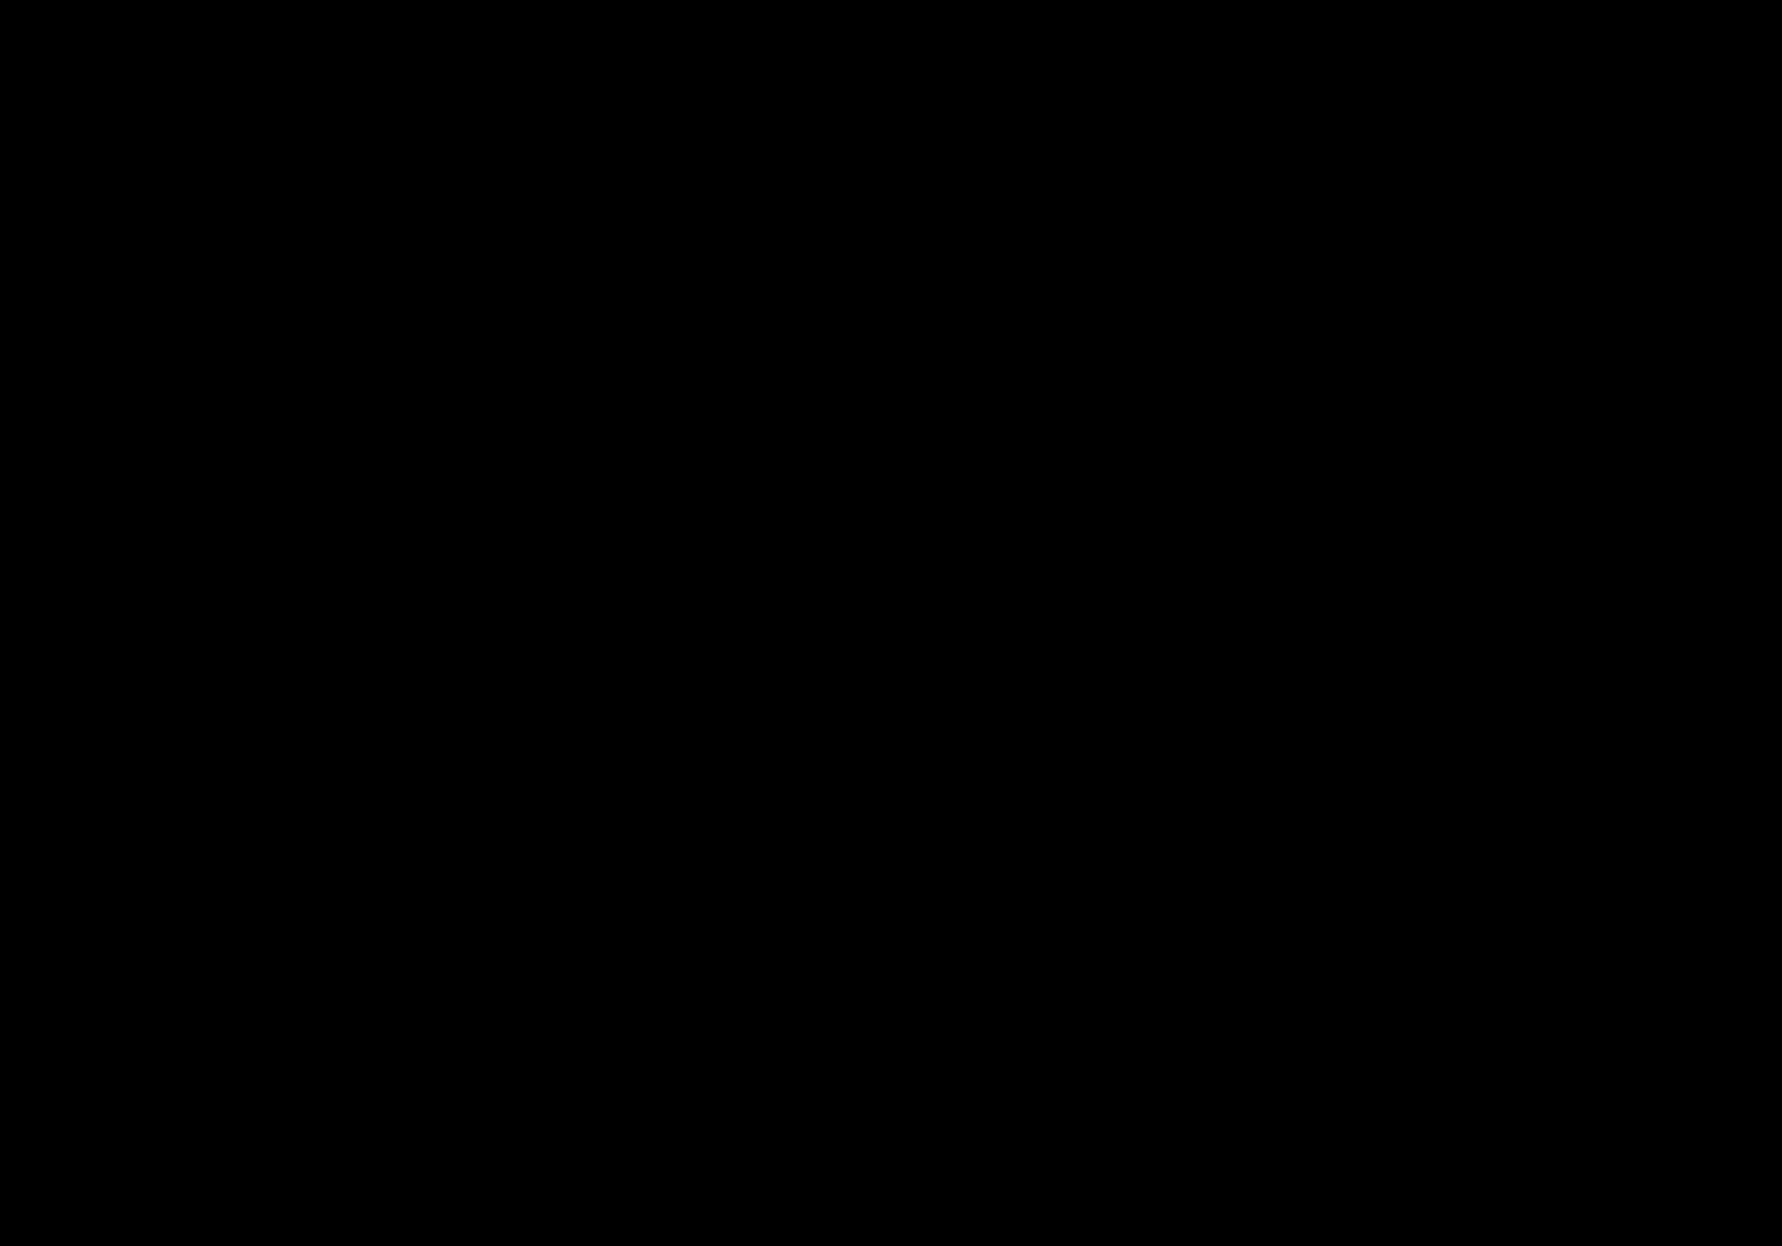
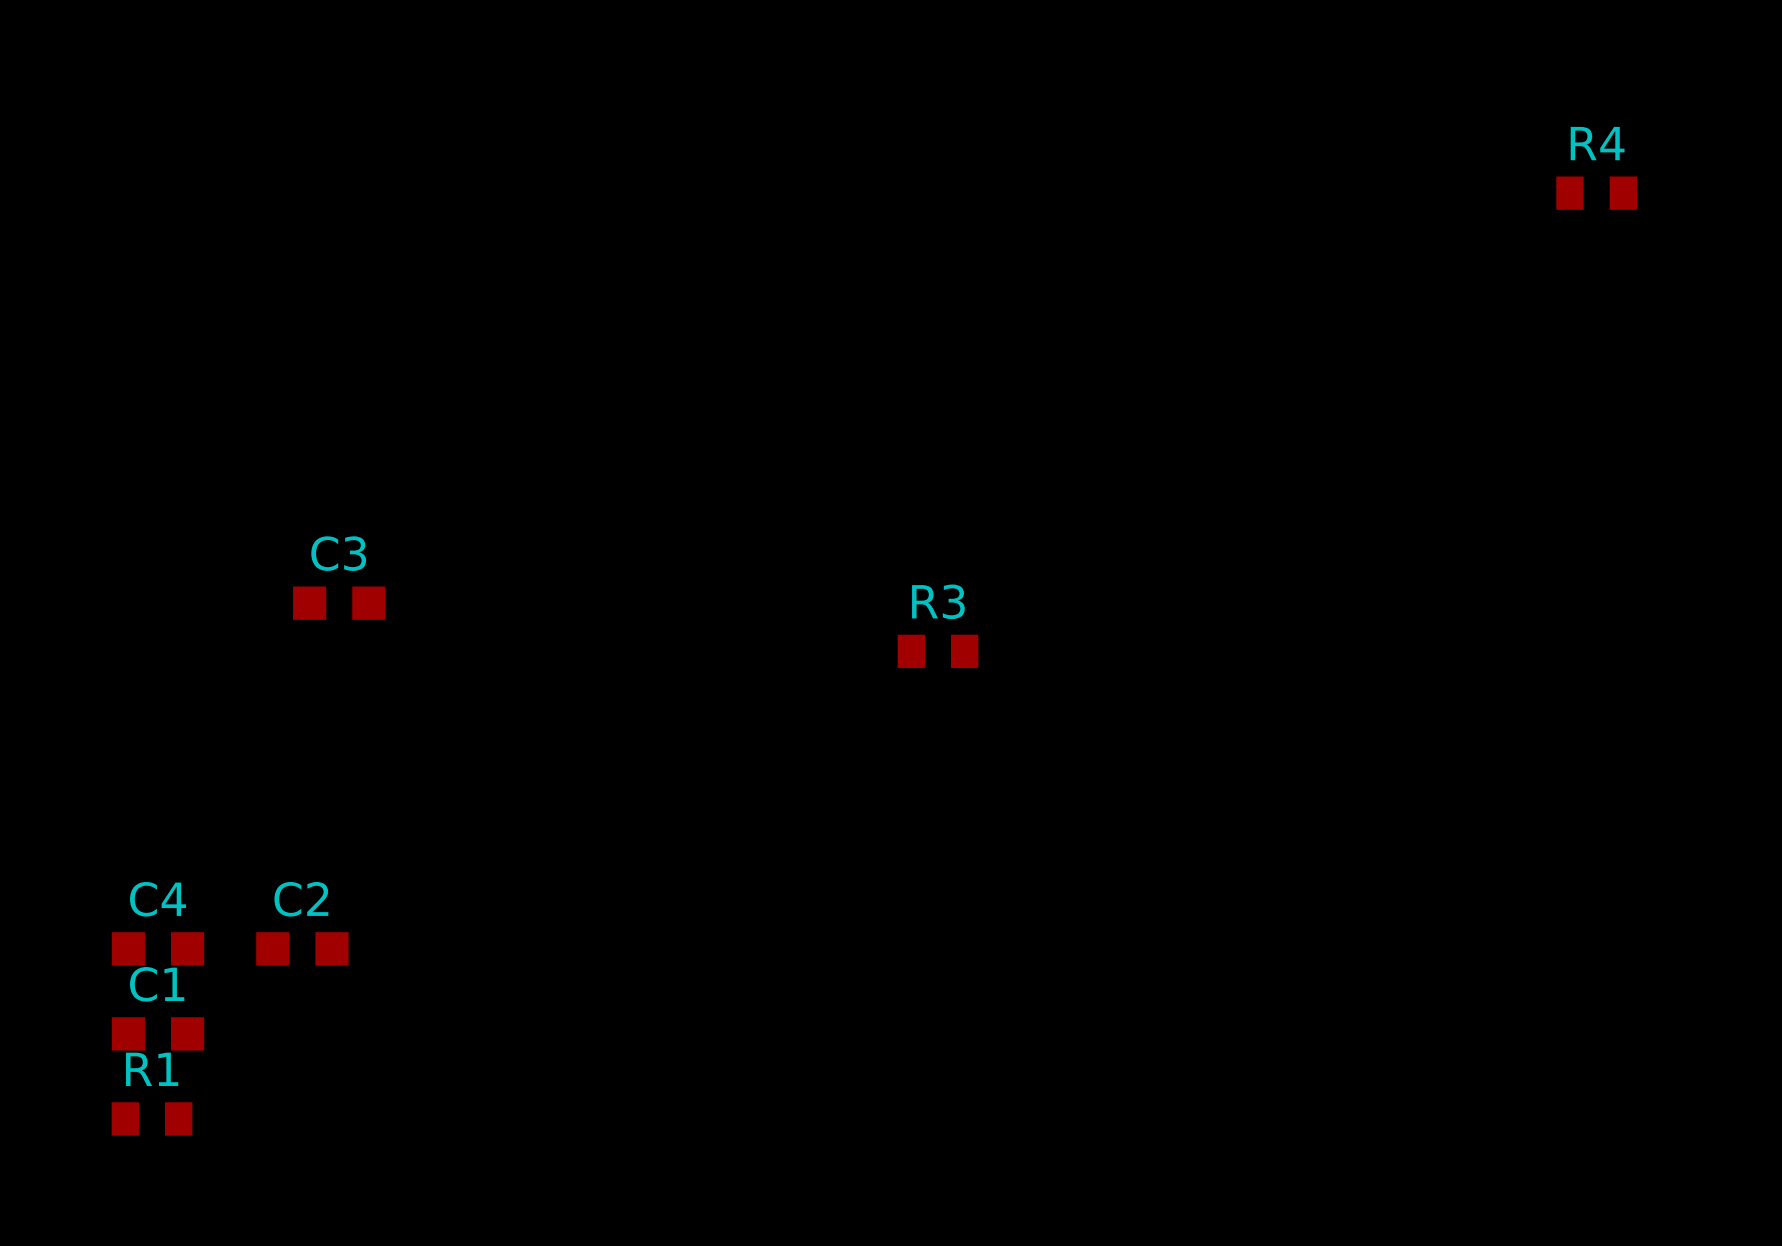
R4: none -> (1596, 193)
C3: none -> (339, 603)
R3: none -> (938, 651)
C4: none -> (157, 948)
C2: none -> (302, 948)
C1: none -> (157, 1033)
R1: none -> (151, 1118)

